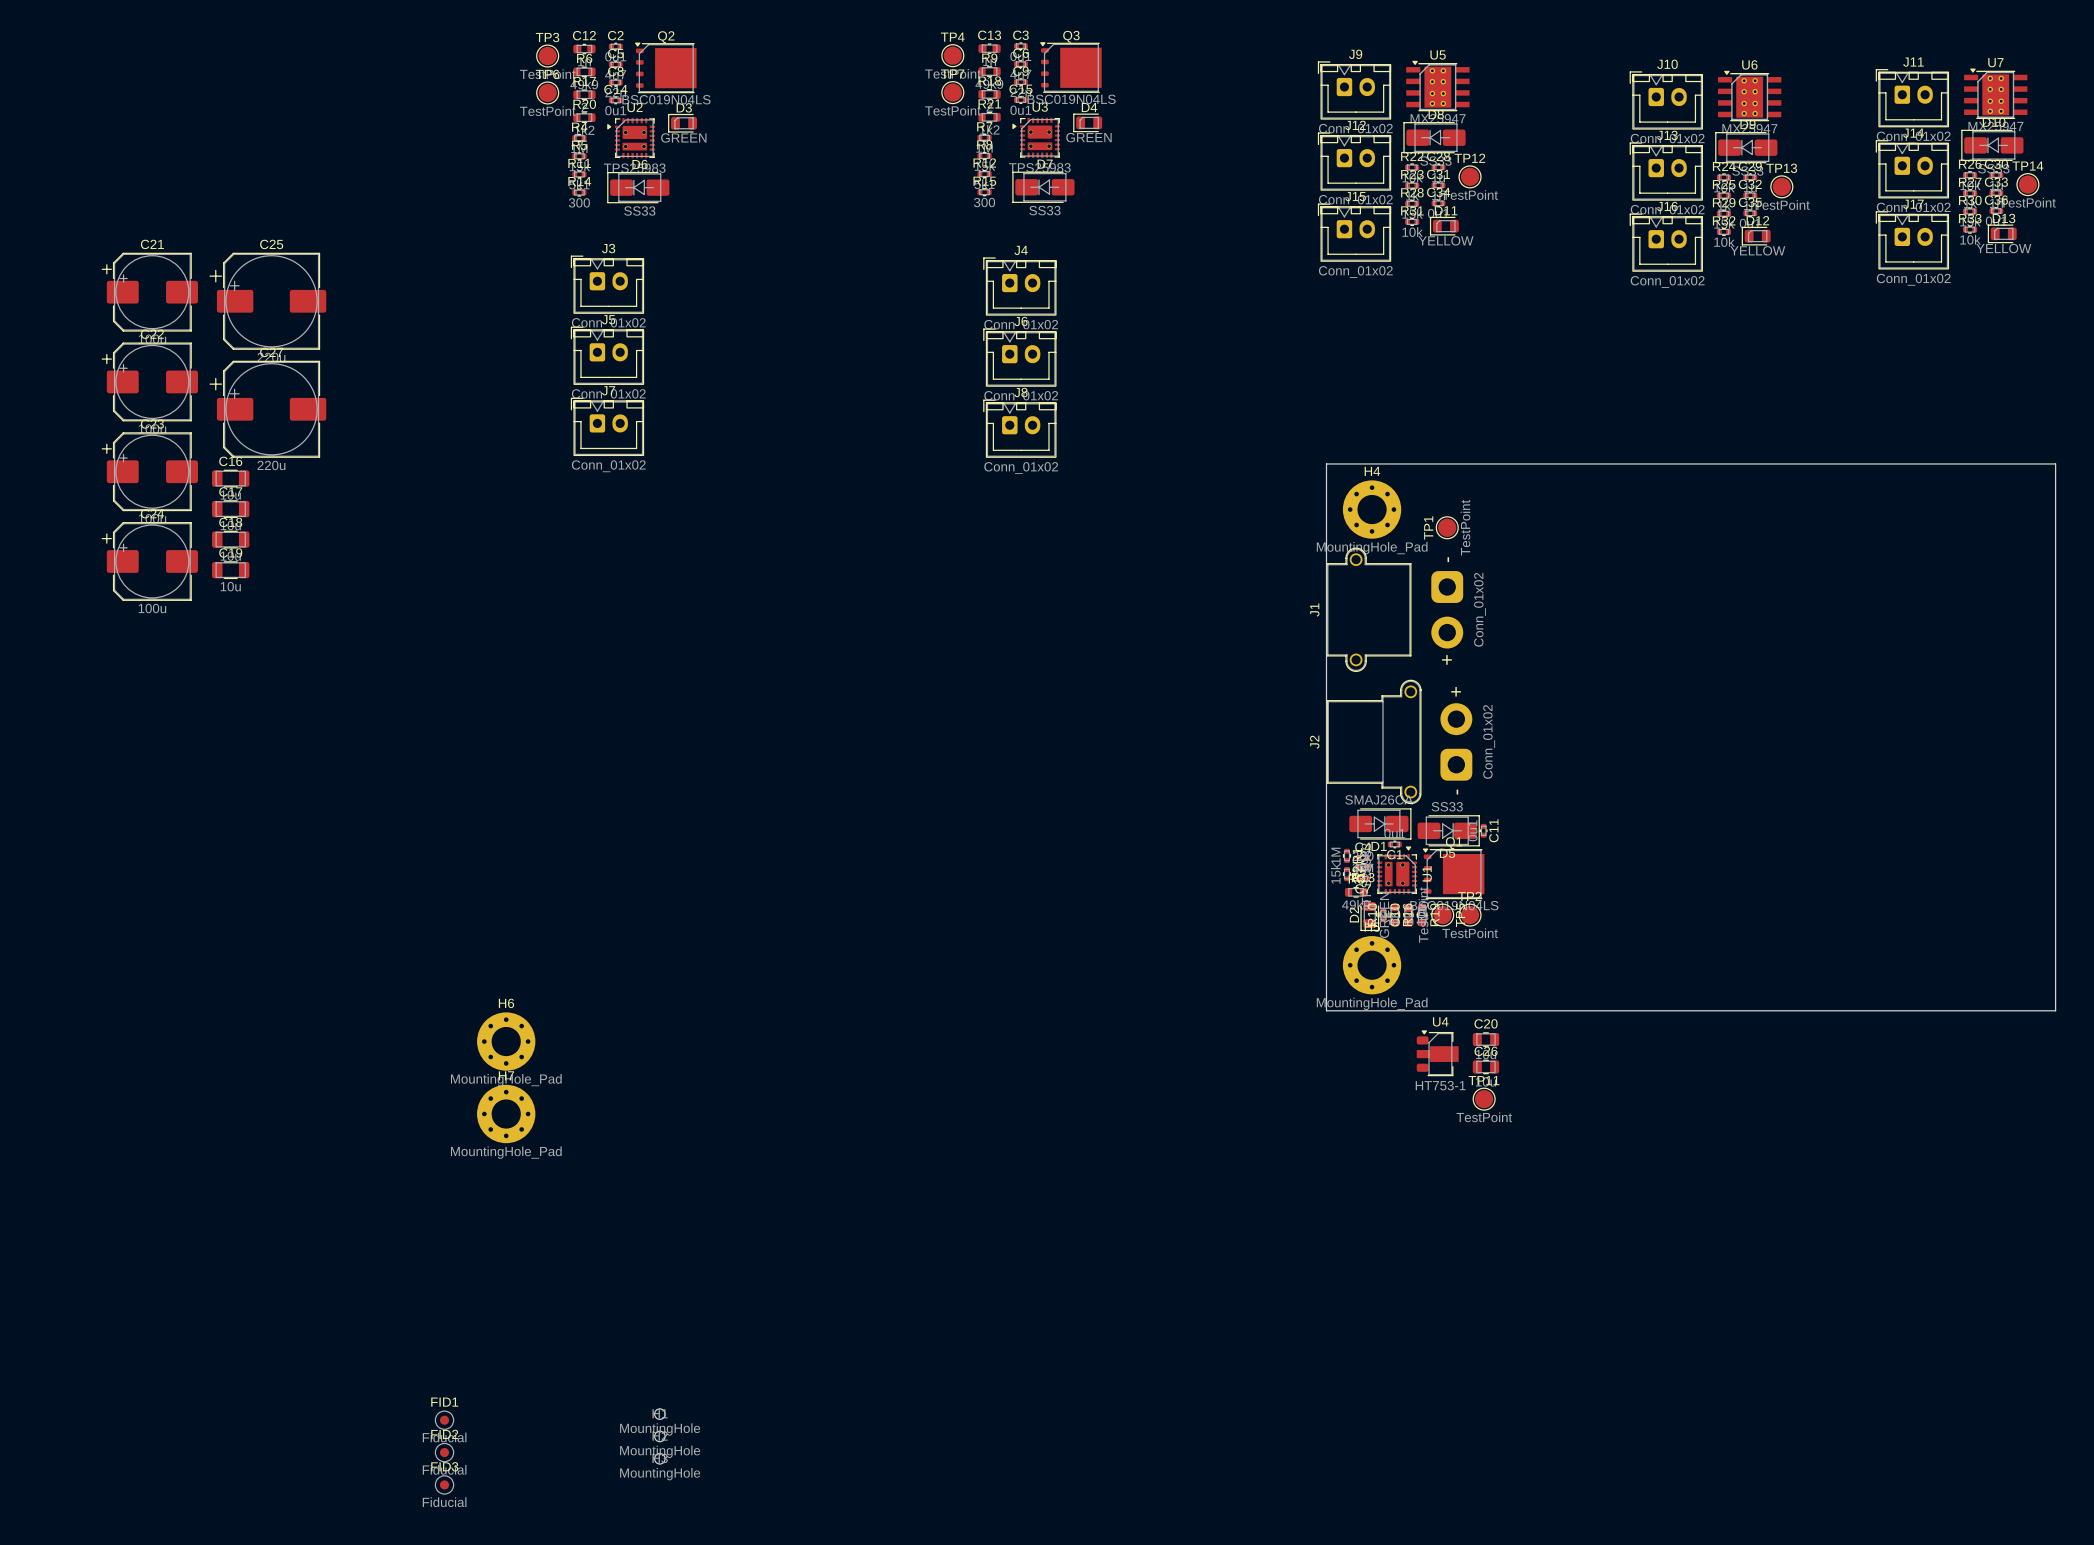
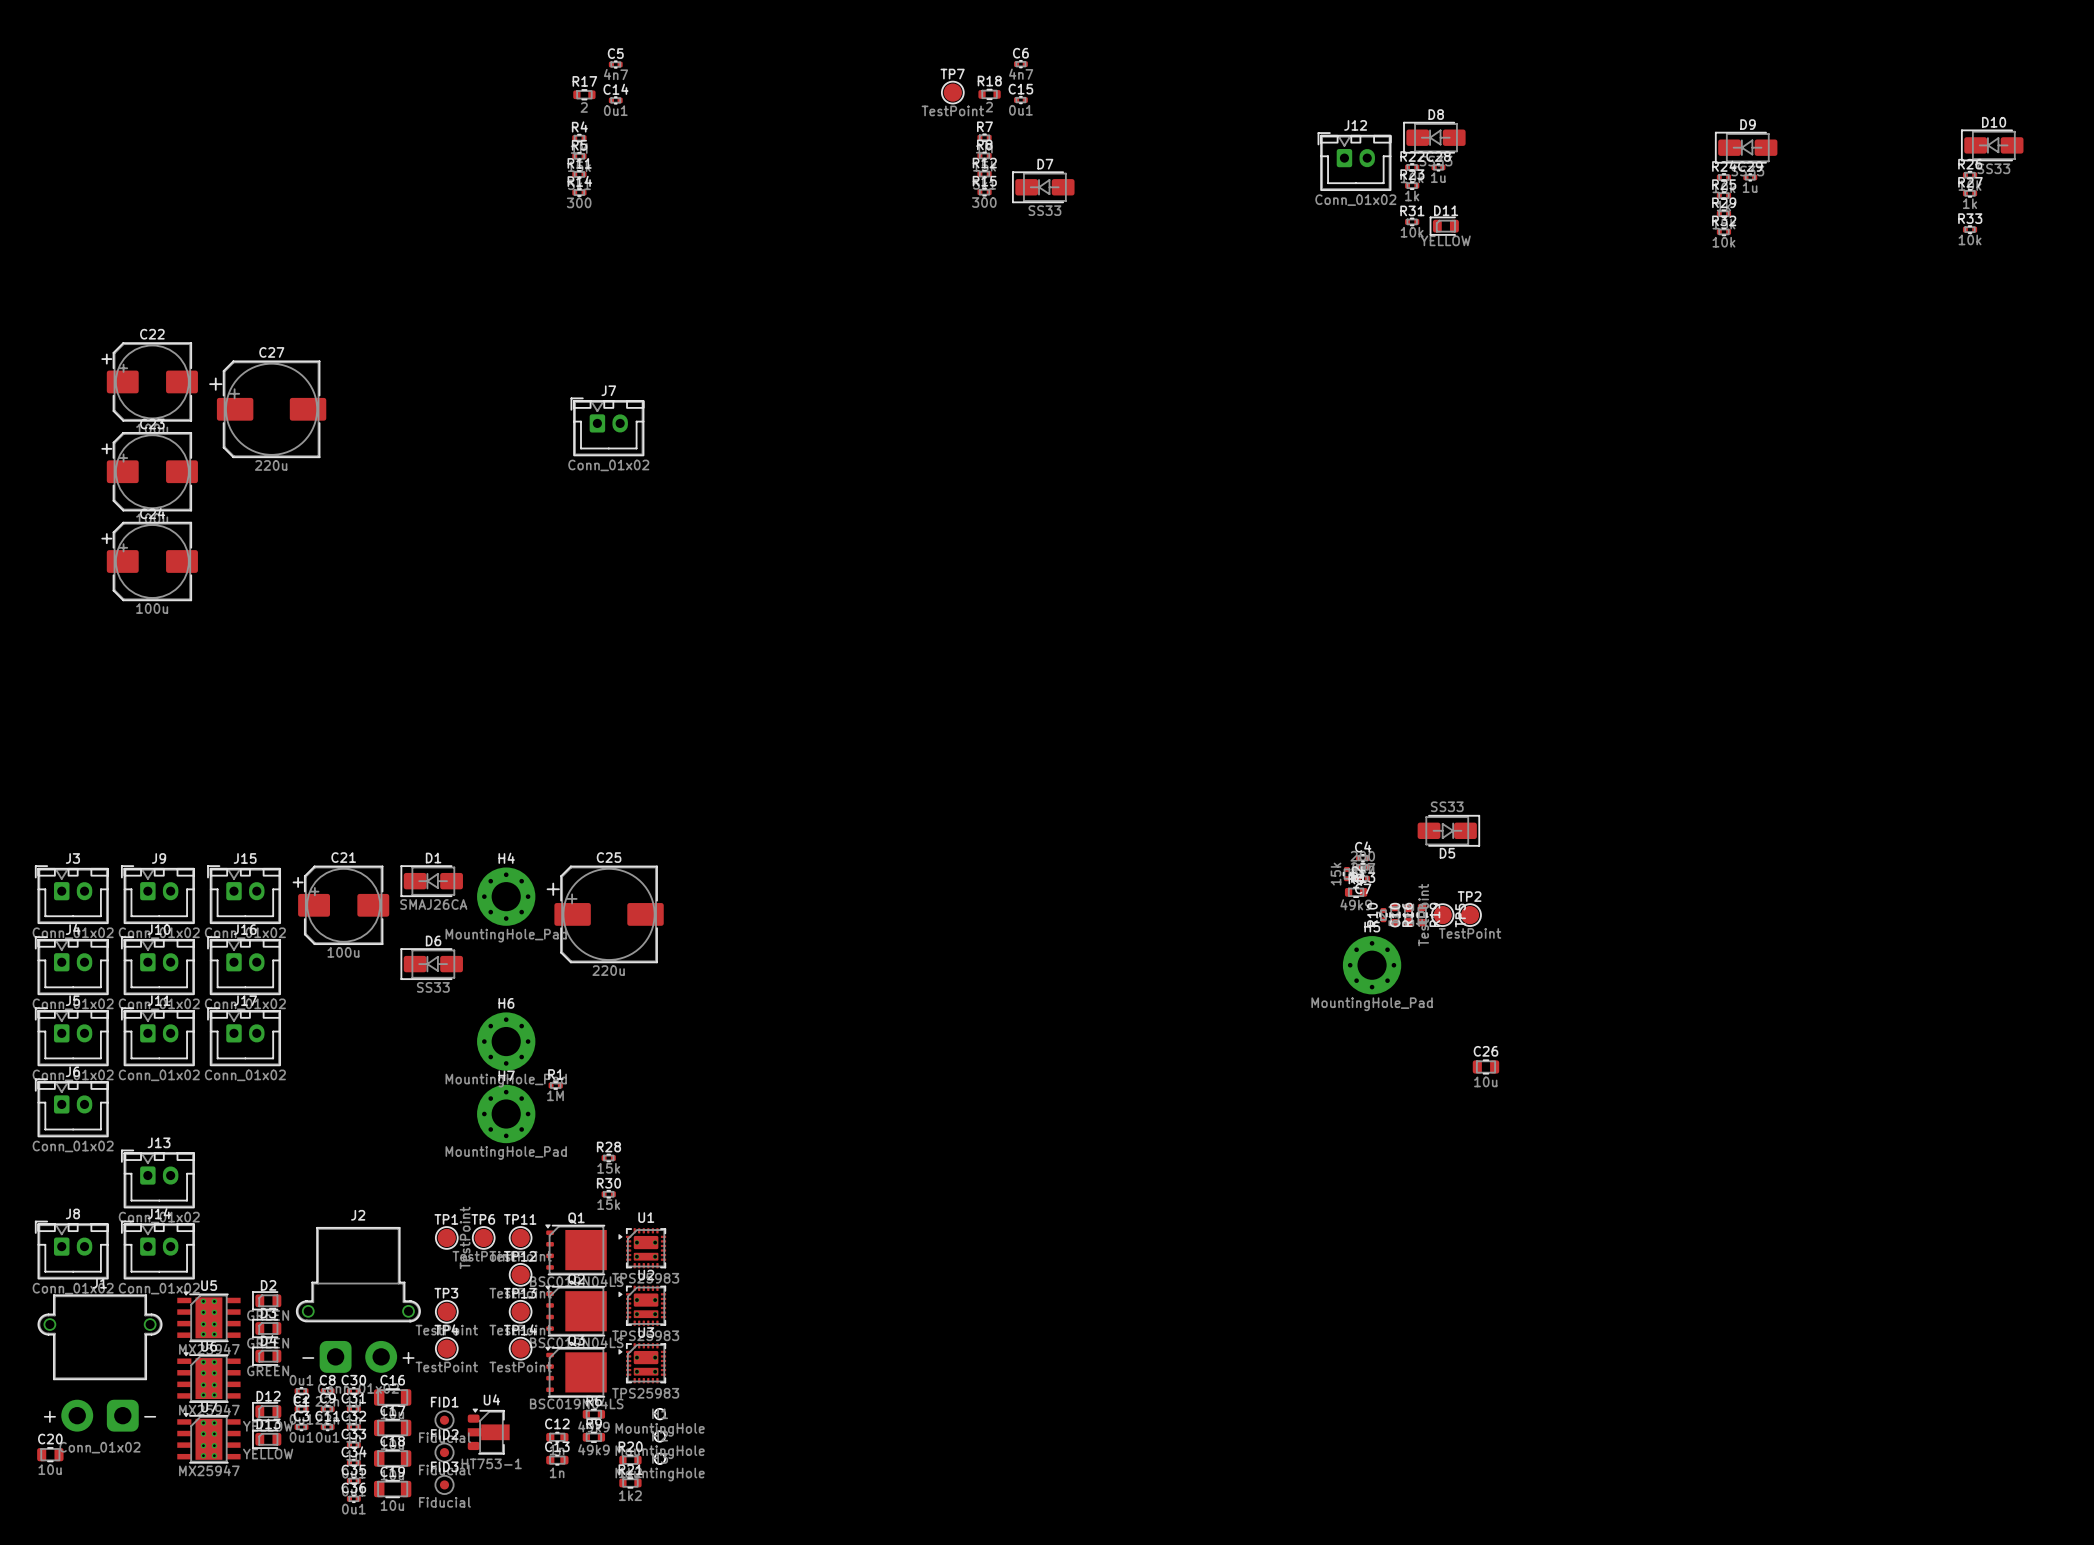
C2 position: (615, 46) -> (301, 1409)
C3 position: (1020, 46) -> (301, 1427)
C13 position: (989, 48) -> (557, 1460)
C12 position: (584, 49) -> (557, 1437)
TP4 position: (952, 55) -> (446, 1348)
TP3 position: (547, 56) -> (446, 1311)
Q2 position: (665, 67) -> (575, 1310)
Q3 position: (1070, 67) -> (575, 1372)
R6 position: (584, 71) -> (593, 1414)
R9 position: (989, 71) -> (593, 1437)
C8 position: (615, 82) -> (327, 1391)
C9 position: (1020, 82) -> (327, 1409)
U5 position: (1437, 86) -> (208, 1316)
J9 position: (1354, 90) -> (157, 894)
TP6 position: (547, 92) -> (483, 1237)
U7 position: (1995, 93) -> (208, 1438)
U6 position: (1749, 96) -> (208, 1377)
J11 position: (1912, 98) -> (157, 1036)
J10 position: (1666, 100) -> (157, 965)
R20 position: (584, 117) -> (630, 1460)
R21 position: (989, 117) -> (630, 1483)
D4 position: (1087, 122) -> (266, 1356)
D3 position: (682, 123) -> (266, 1328)
U3 position: (1036, 137) -> (642, 1363)
U2 position: (631, 138) -> (642, 1305)
J14 position: (1912, 169) -> (157, 1250)
J13 position: (1666, 171) -> (157, 1178)
C30 position: (1996, 175) -> (353, 1391)
TP12 position: (1470, 176) -> (520, 1274)
TP14 position: (2027, 184) -> (520, 1348)
C31 position: (1438, 185) -> (353, 1409)
TP13 position: (1781, 186) -> (520, 1311)
D6 position: (638, 187) -> (431, 964)
C33 position: (1996, 193) -> (353, 1445)
C32 position: (1750, 195) -> (353, 1427)
R28 position: (1412, 203) -> (608, 1158)
C34 position: (1438, 203) -> (353, 1462)
R30 position: (1970, 211) -> (608, 1194)
C36 position: (1996, 211) -> (353, 1498)
C35 position: (1750, 213) -> (353, 1480)
J15 position: (1354, 232) -> (244, 894)
D13 position: (2002, 233) -> (266, 1439)
D12 position: (1756, 236) -> (266, 1411)
J17 position: (1912, 240) -> (244, 1036)
J16 position: (1666, 242) -> (244, 965)
J3 position: (607, 284) -> (71, 894)
J4 position: (1019, 286) -> (71, 965)
C21 position: (149, 292) -> (341, 905)
C25 position: (267, 301) -> (605, 914)
J5 position: (607, 355) -> (71, 1036)
J6 position: (1019, 357) -> (71, 1107)
J8 position: (1019, 428) -> (71, 1250)
board edge: (1326, 463) (2055, 463) (2055, 1010) (1326, 1010) (1326, 463) -> none
C16 position: (230, 478) -> (392, 1397)
C17 position: (230, 509) -> (392, 1427)
H4 position: (1372, 509) -> (506, 896)
TP1 name rotation: 0° (1428, 527) -> 90° clockwise (446, 1219)
TP1 position: (1447, 527) -> (446, 1237)
C18 position: (230, 539) -> (392, 1458)
C19 position: (230, 570) -> (392, 1489)
J1 rotation: 0° (1394, 609) -> 90° clockwise (100, 1363)
J1 position: (1394, 609) -> (100, 1363)
J2 rotation: 0° (1399, 741) -> 90° clockwise (358, 1300)
J2 position: (1399, 741) -> (358, 1300)
D1 rotation: 0° (1380, 823) -> 180° (431, 881)
D1 position: (1380, 823) -> (431, 881)
C11 rotation: 0° (1483, 830) -> 90° clockwise (327, 1427)
C11 position: (1483, 830) -> (327, 1427)
C1 position: (1394, 844) -> (301, 1391)
R1 rotation: 0° (1347, 855) -> 90° clockwise (555, 1085)
R1 position: (1347, 855) -> (555, 1085)
U1 rotation: 0° (1397, 870) -> 90° counterclockwise (642, 1248)
U1 position: (1397, 870) -> (642, 1248)
Q1 position: (1453, 873) -> (575, 1249)
D2 rotation: 0° (1369, 916) -> 90° clockwise (266, 1300)
D2 position: (1369, 916) -> (266, 1300)
C20 position: (1485, 1039) -> (50, 1454)
U4 position: (1437, 1053) -> (488, 1431)
TP11 position: (1484, 1099) -> (520, 1237)

